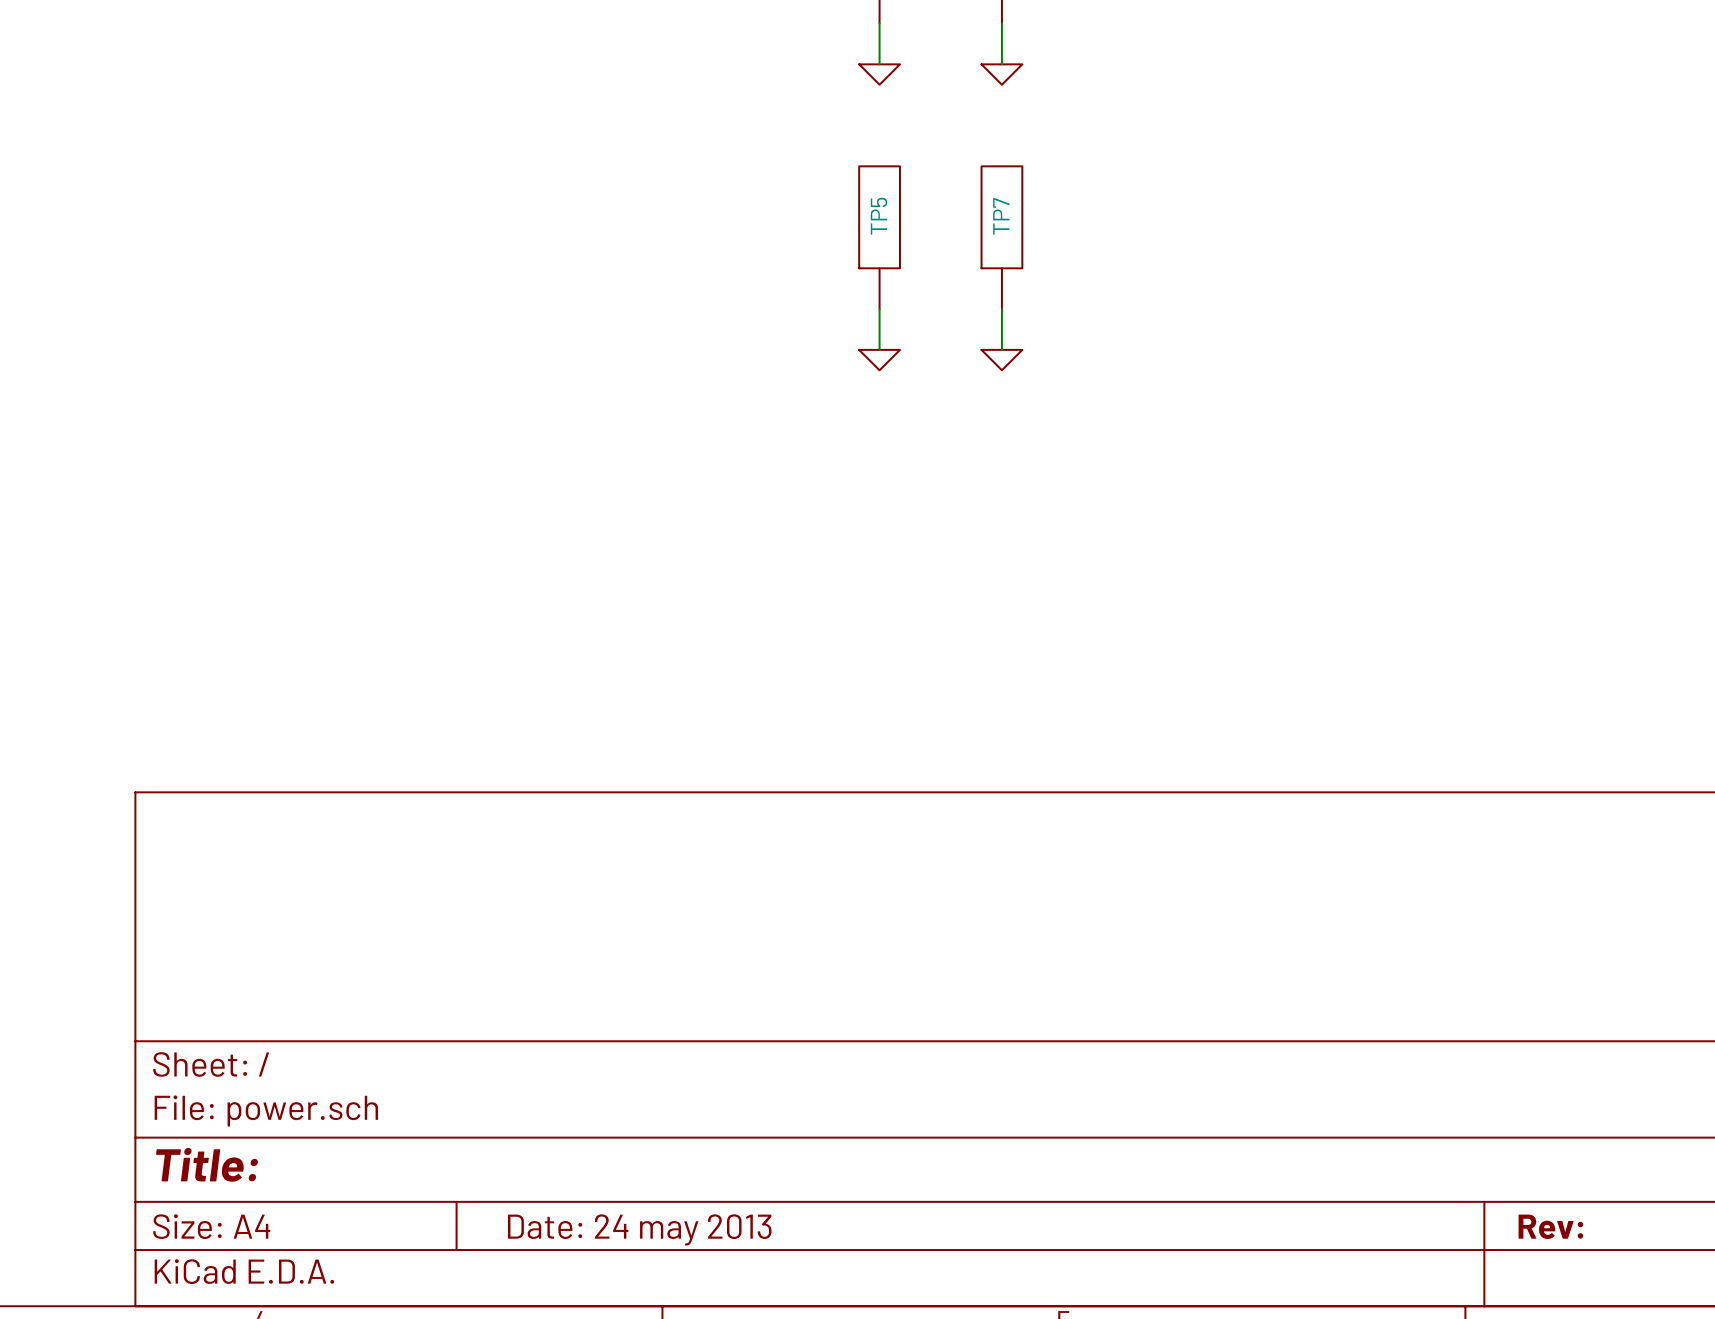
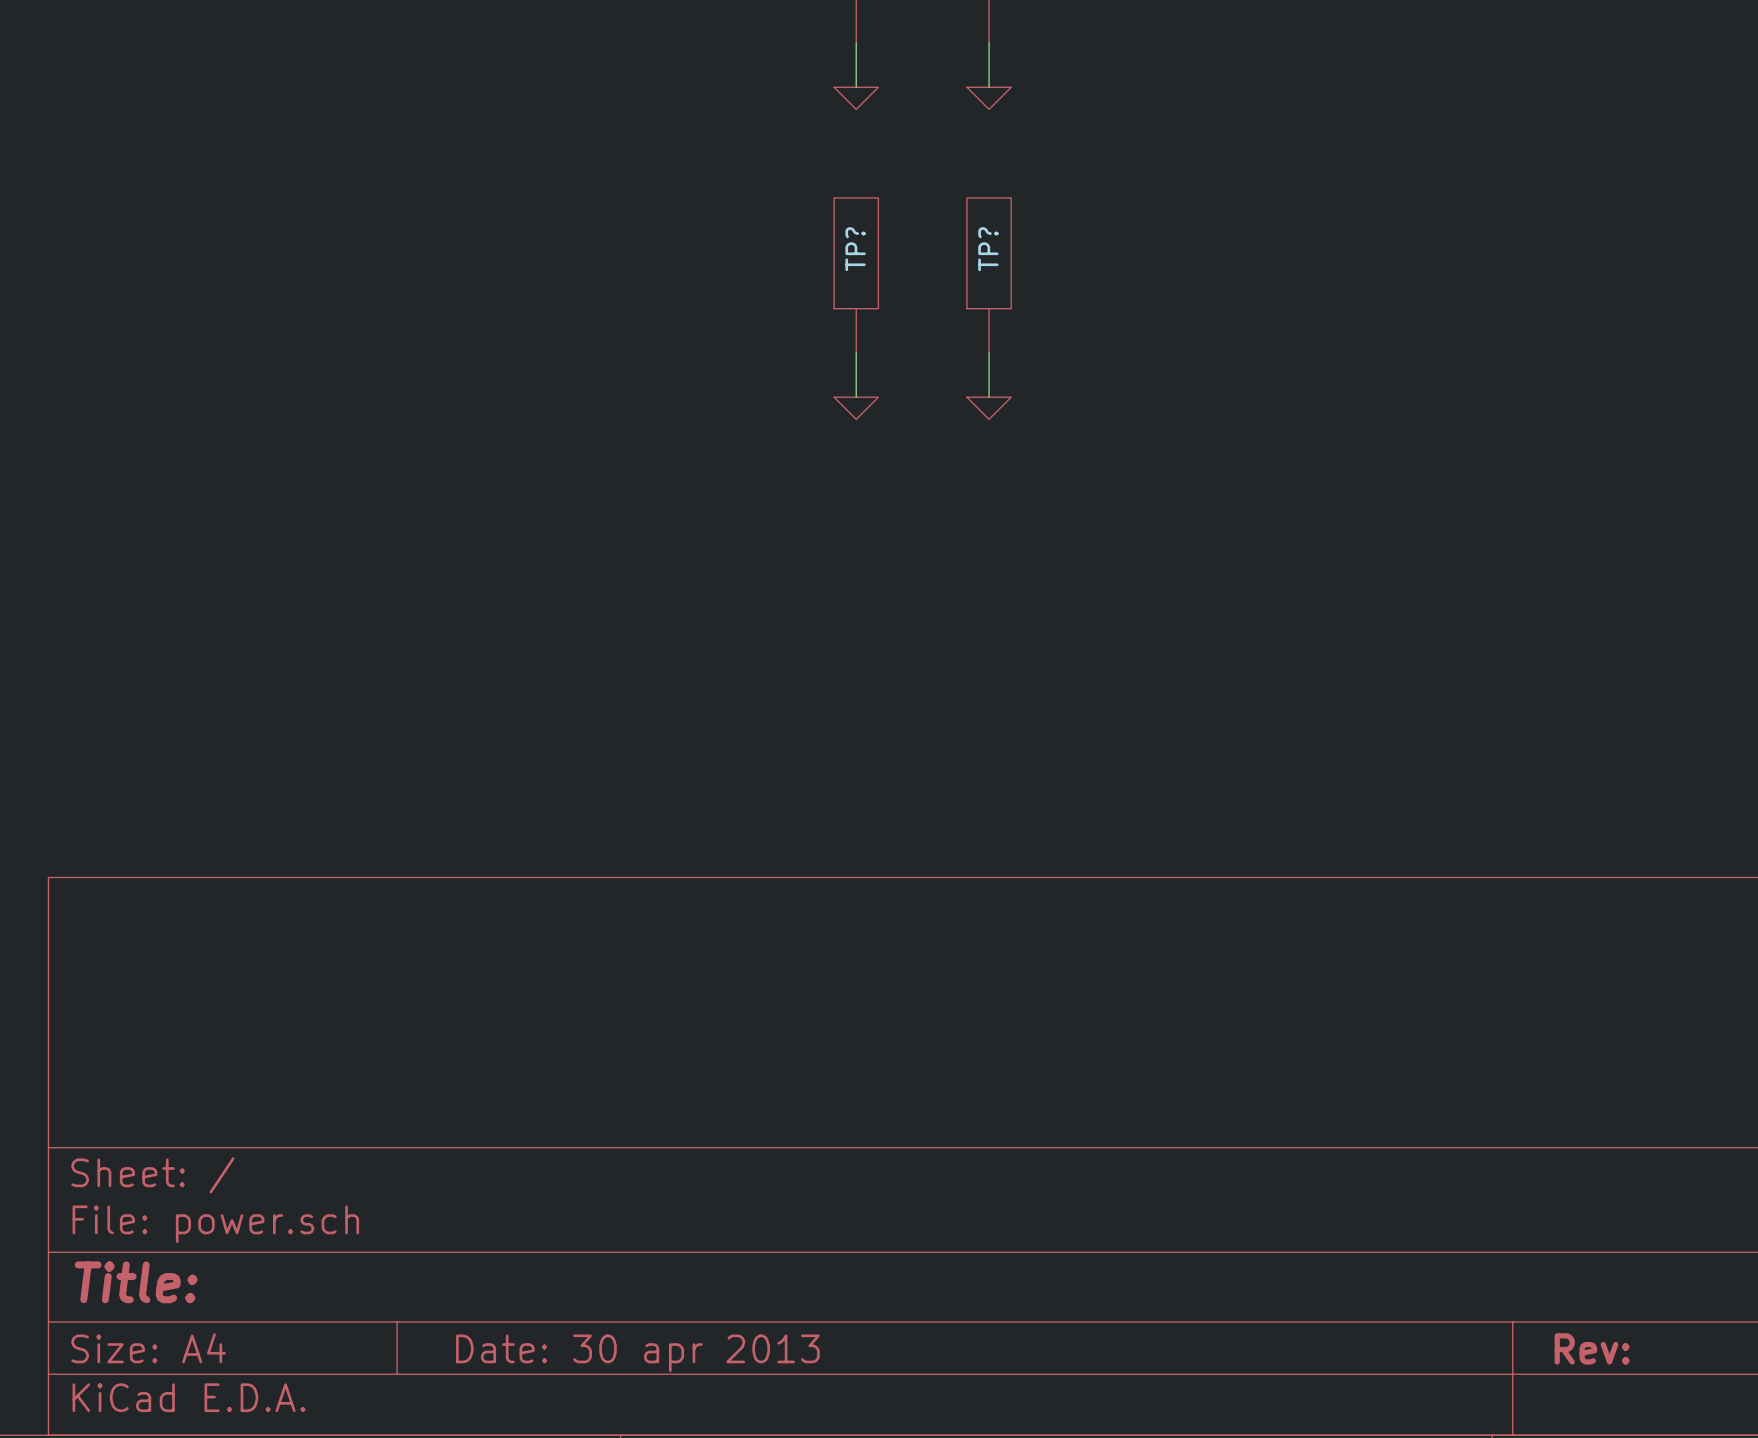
TP5 name: TP5 (879, 216) -> TP? (855, 249)
TP7 name: TP7 (1001, 216) -> TP? (988, 249)
title block: Date: 24 may 2013 (639, 1229) -> Date: 30 apr 2013 (637, 1353)

